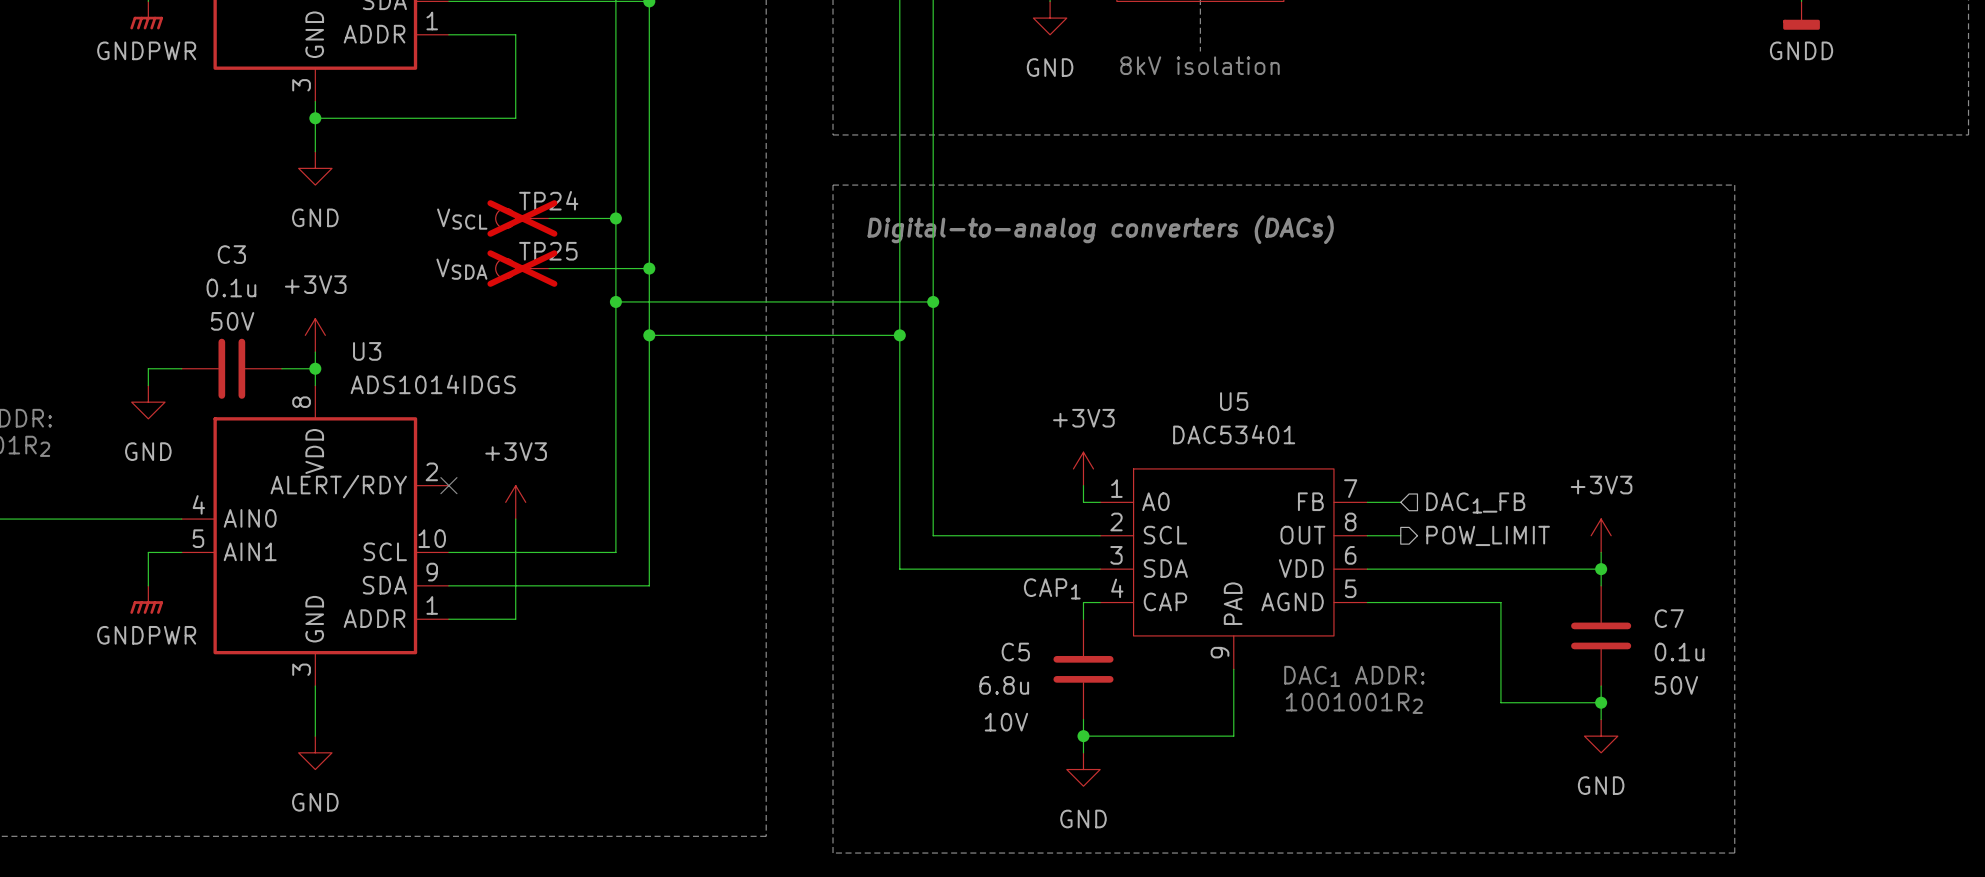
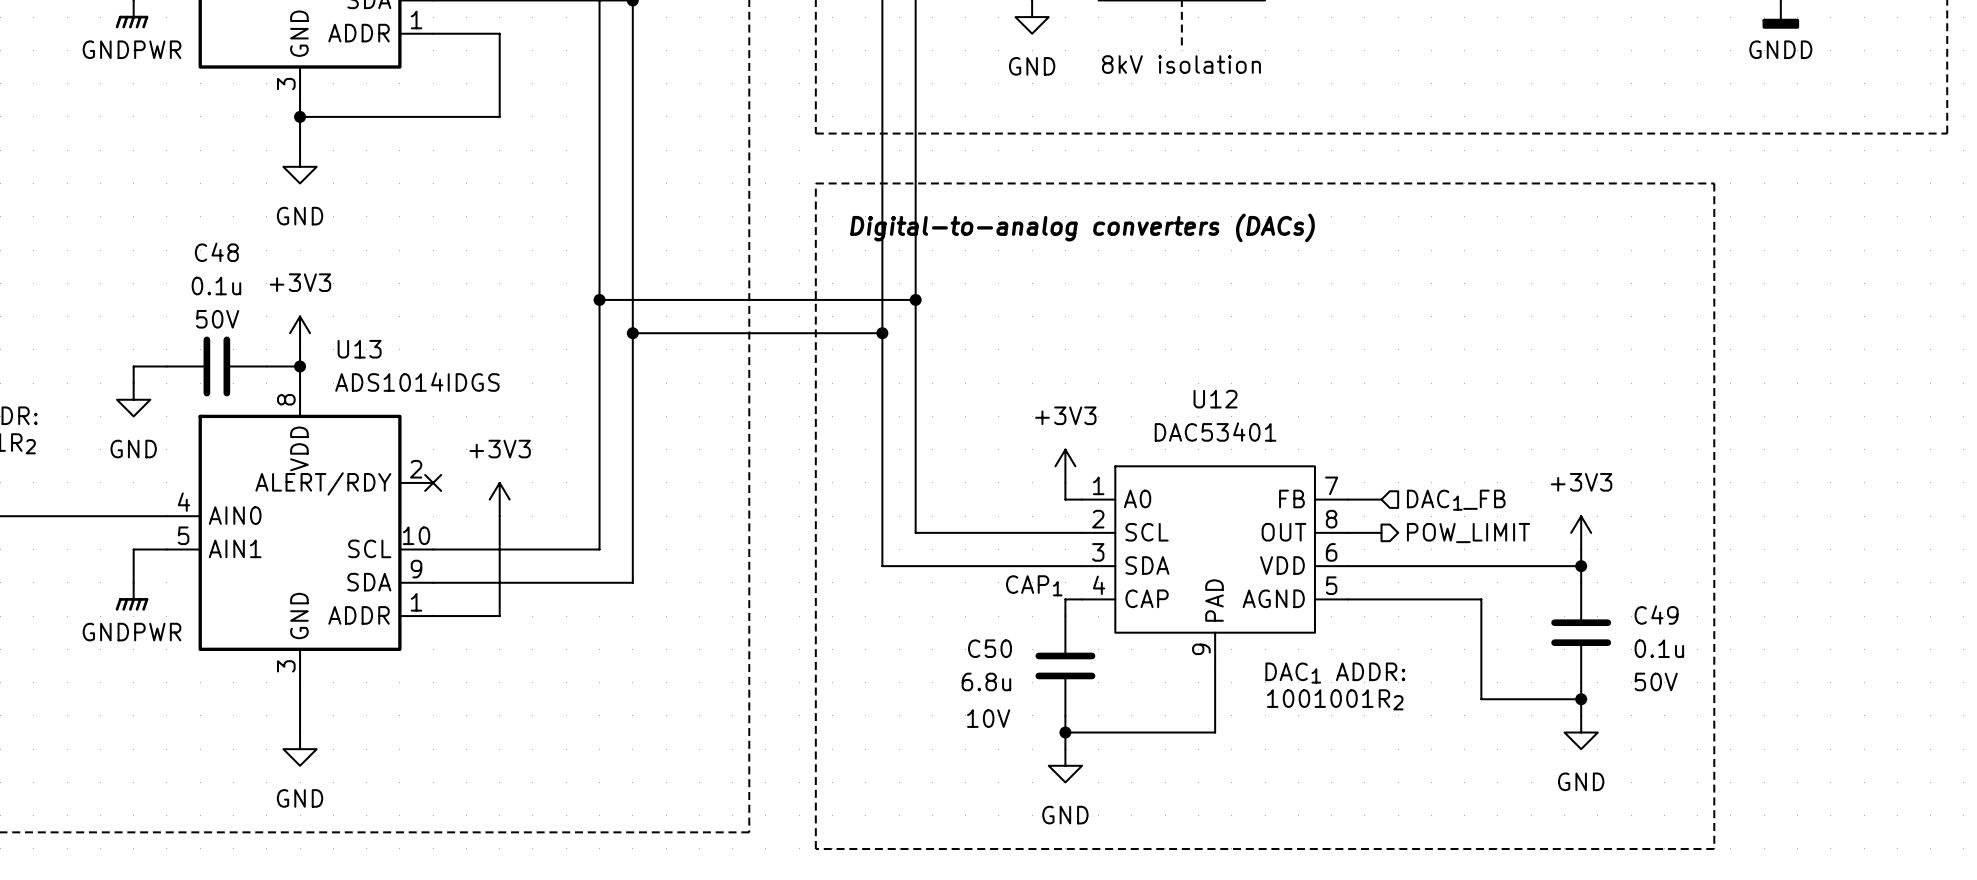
TP24: VSCL (522, 218) -> none
wire: (549, 218) (615, 218) -> none
junction: (615, 218) -> none
C3 name: C3 (231, 254) -> C48 (216, 252)
TP25: VSDA (522, 268) -> none
wire: (549, 268) (649, 268) -> none
junction: (649, 268) -> none
U3 name: U3 (367, 351) -> U13 (359, 349)
U5 name: U5 (1234, 401) -> U12 (1215, 399)
C7 name: C7 (1669, 618) -> C49 (1656, 615)
C5 name: C5 (1015, 652) -> C50 (990, 648)

